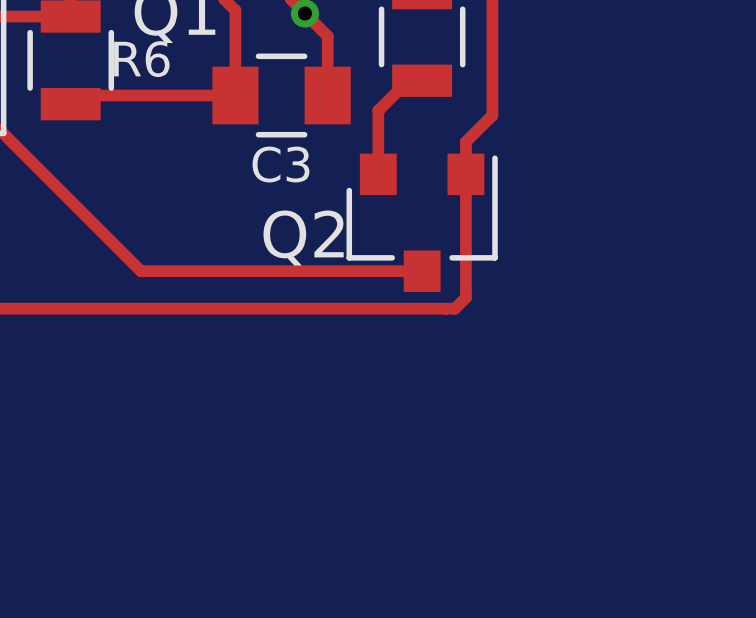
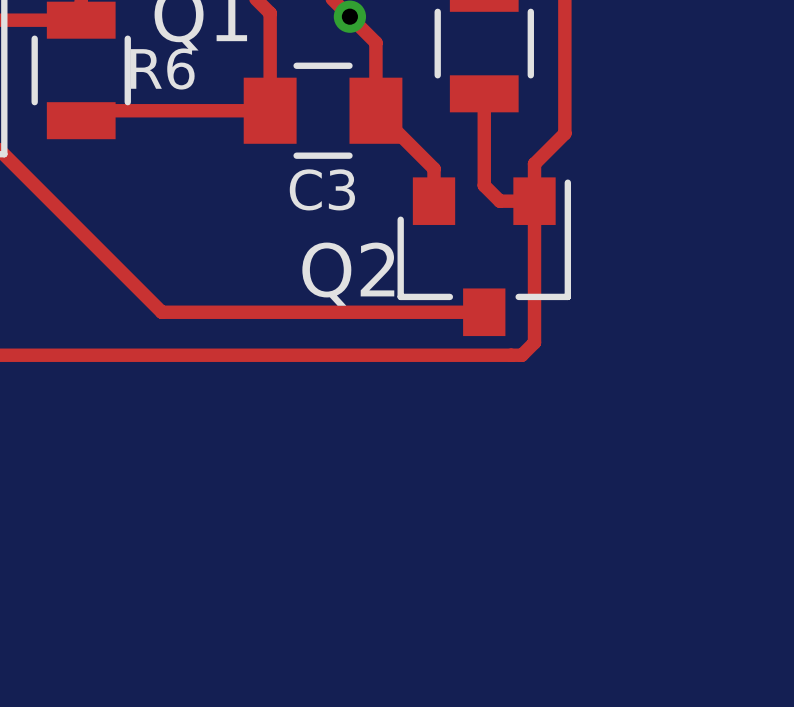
top track: (422, 80) (408, 80) (378, 110) (378, 146) -> (484, 93) (484, 185) (499, 201) (534, 201)
top track: none -> (375, 110) (434, 168)

